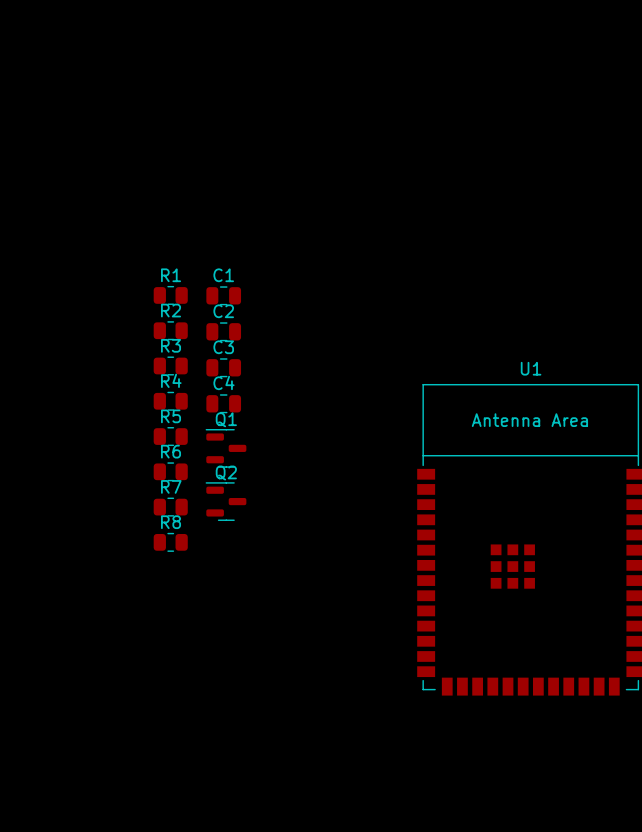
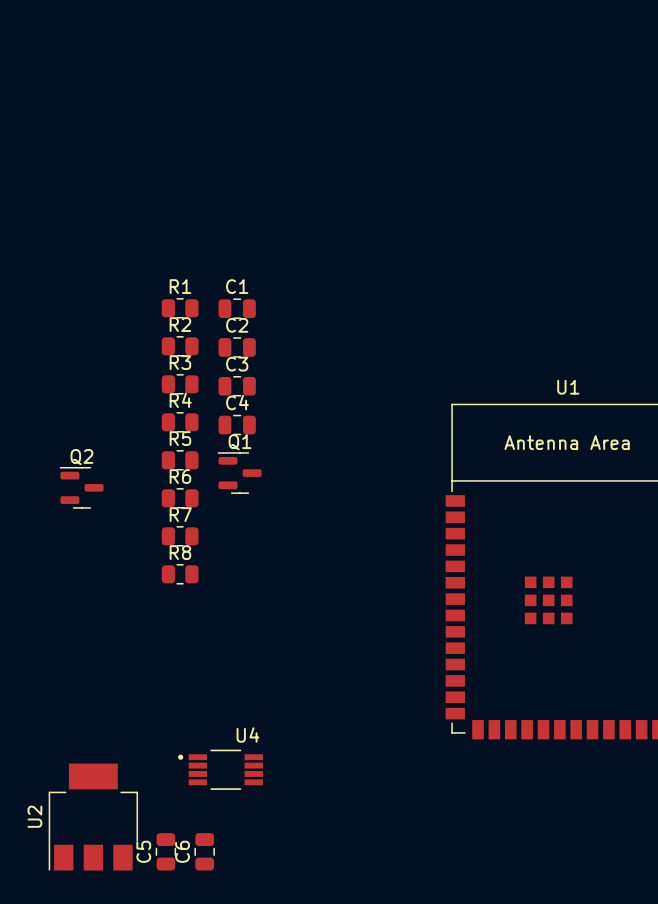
Q2 position: (225, 501) -> (81, 487)
U4: none -> (220, 769)
U2: none -> (93, 817)
C5: none -> (165, 851)
C6: none -> (204, 851)

